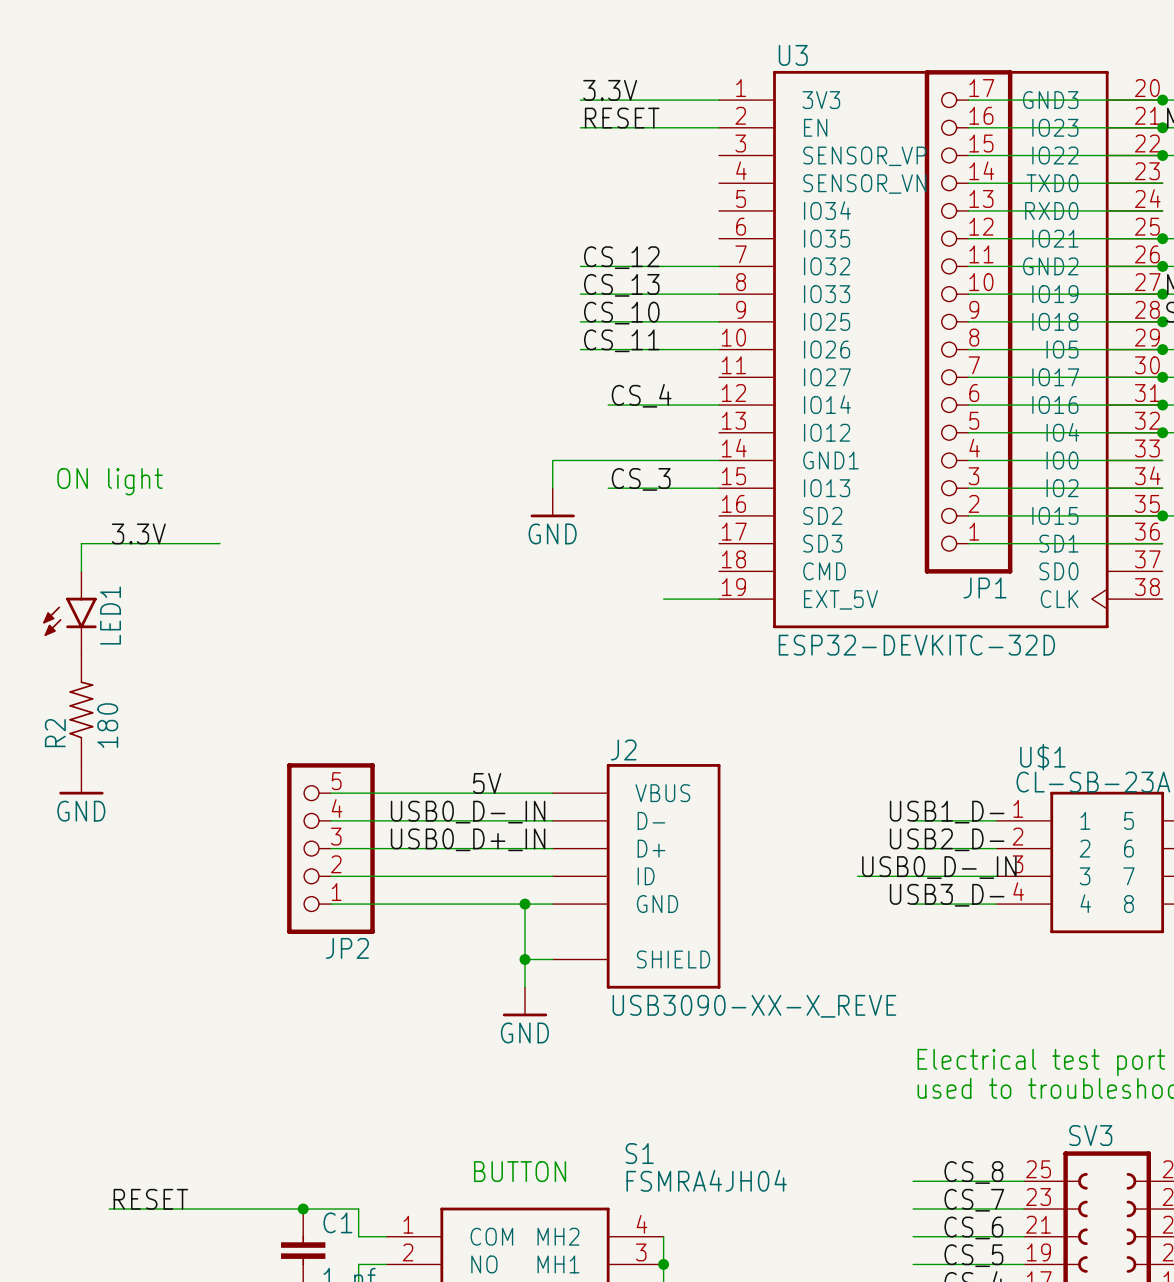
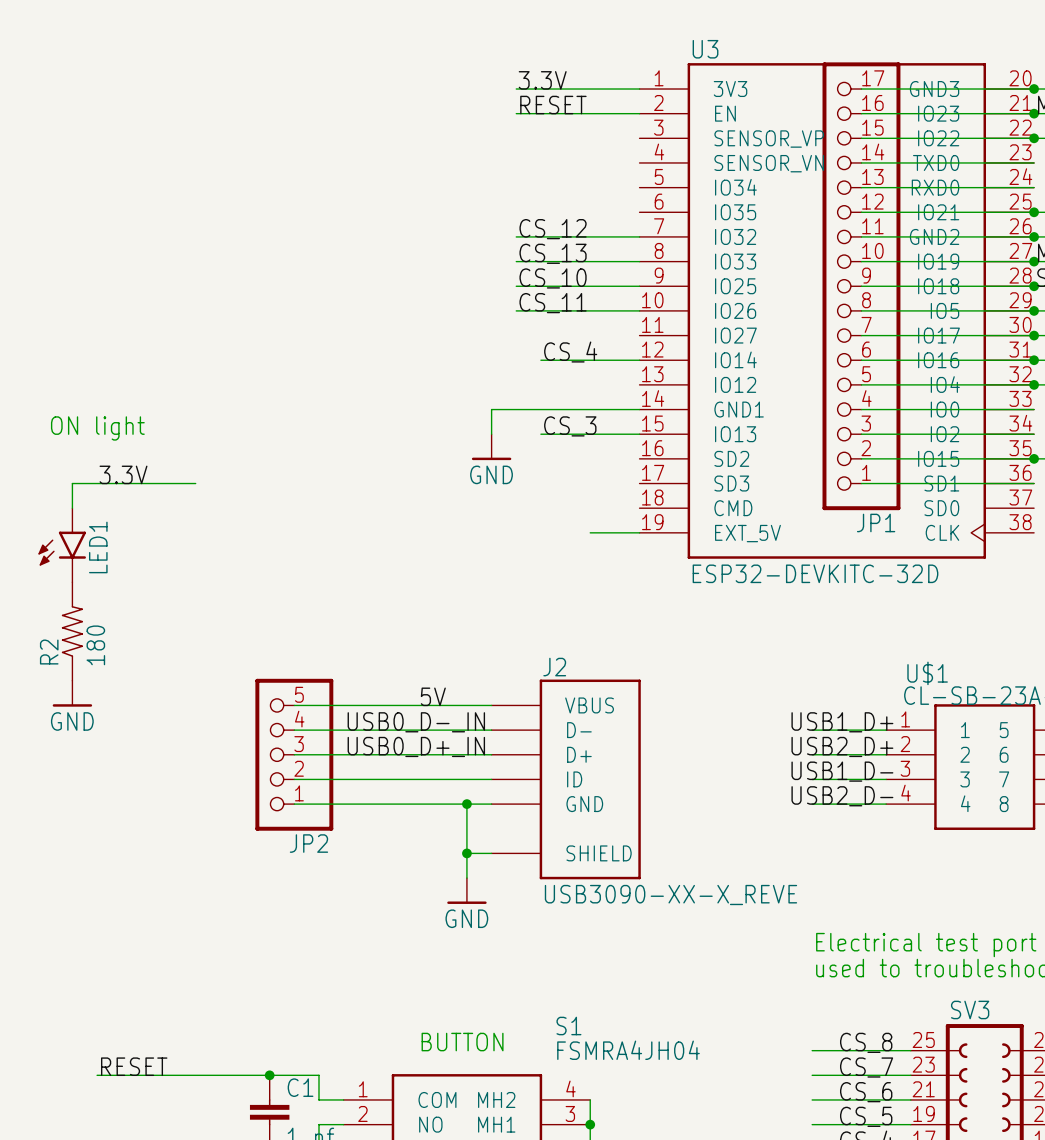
label: USB1_D- (947, 812) -> USB1_D+ (842, 722)
label: USB2_D- (947, 839) -> USB2_D+ (842, 746)
label: USB0_D-_IN (939, 867) -> USB1_D- (842, 771)
wire: (857, 876) (913, 876) -> none
label: USB3_D- (947, 895) -> USB2_D- (842, 796)

